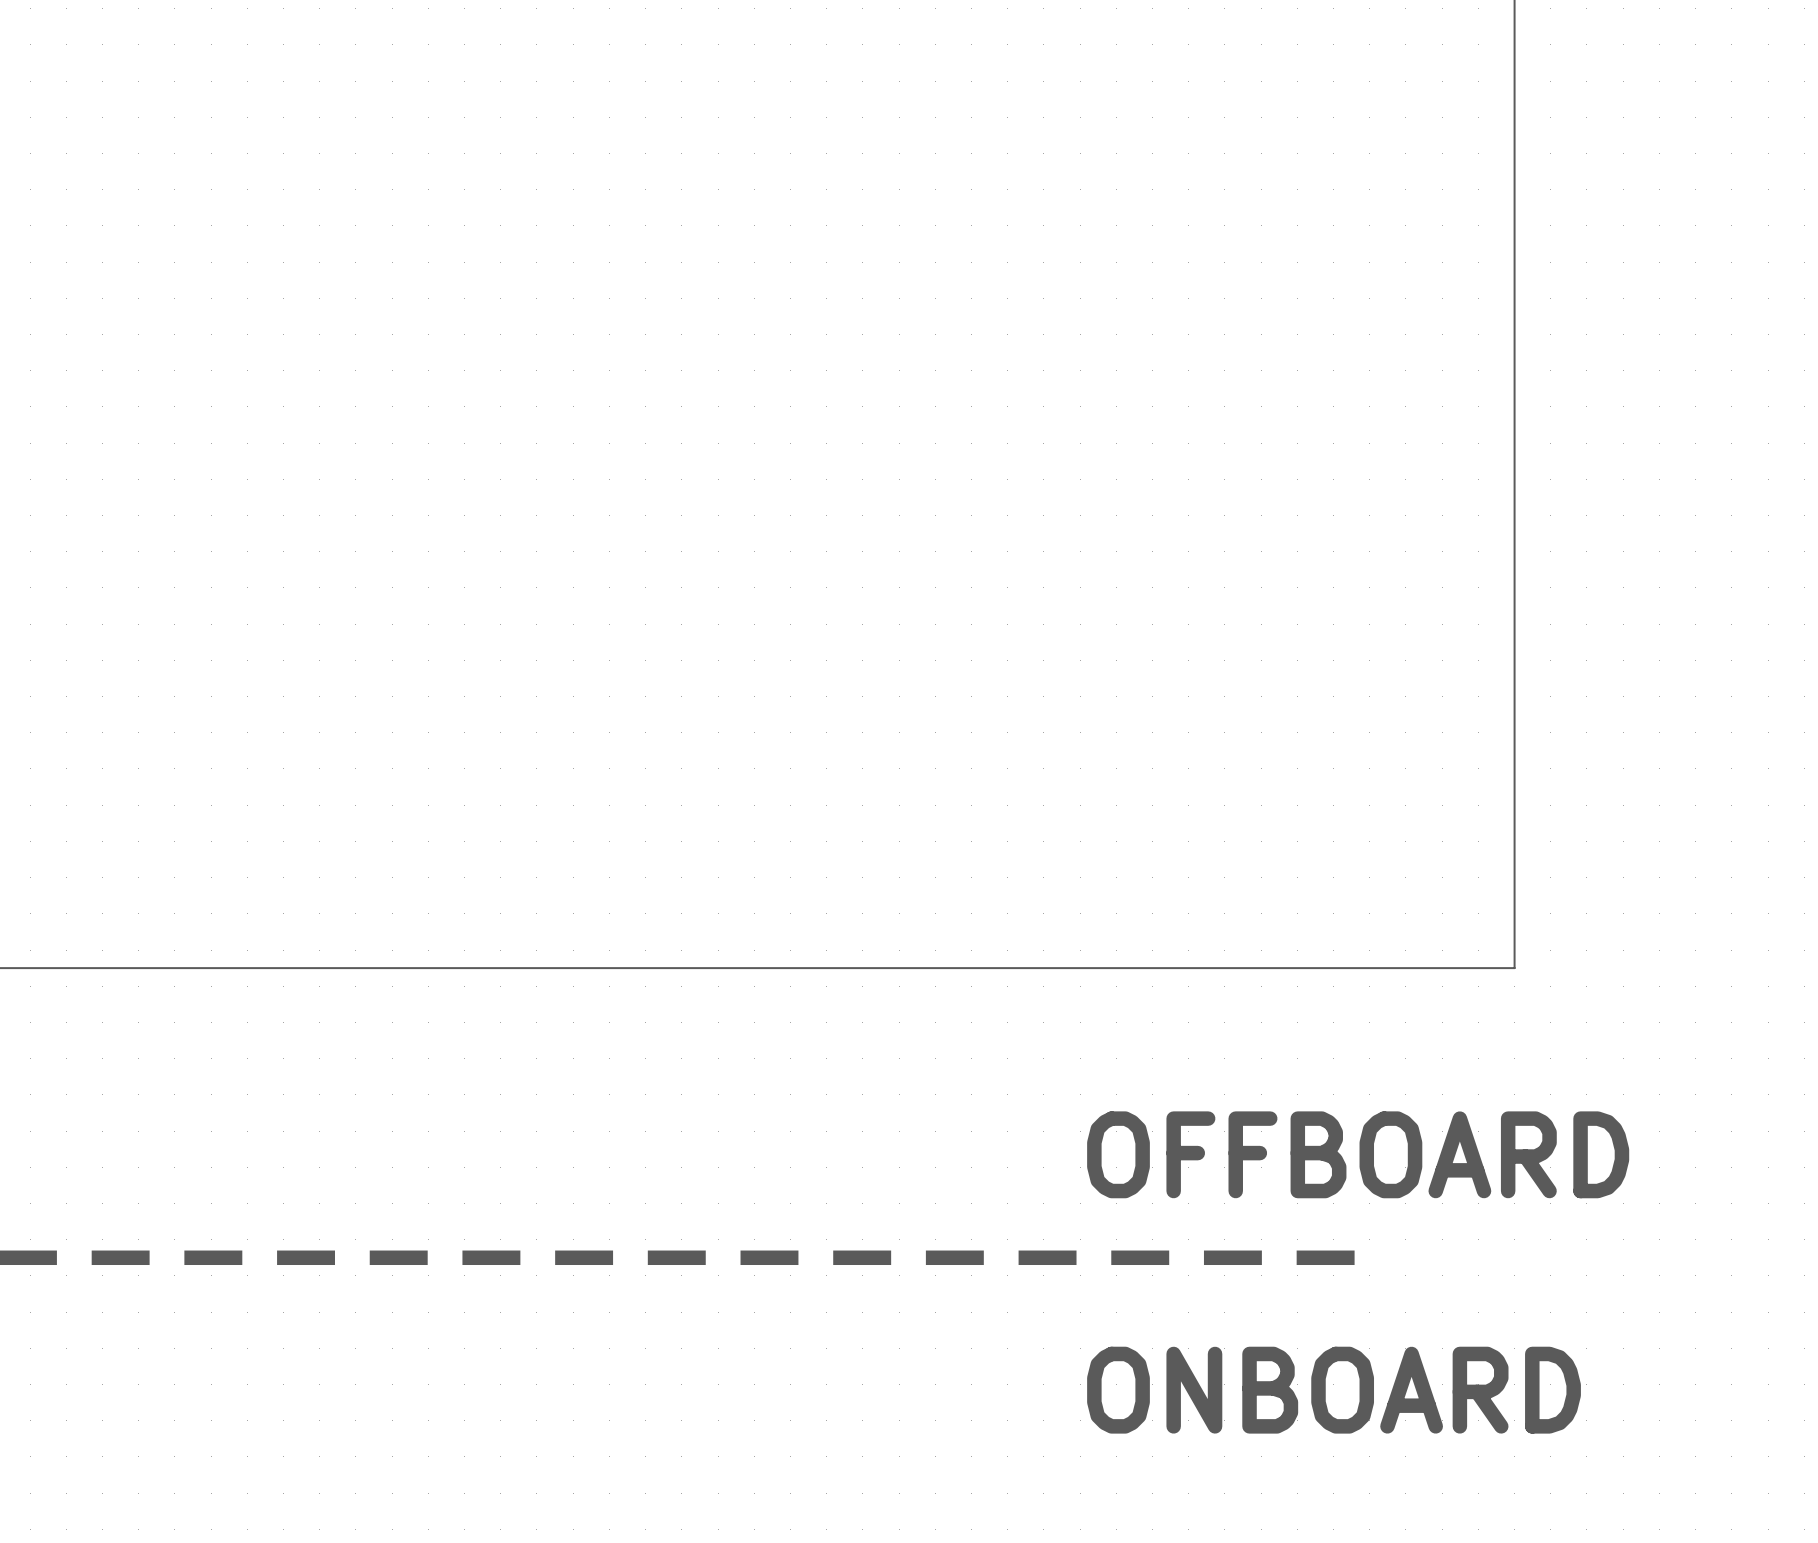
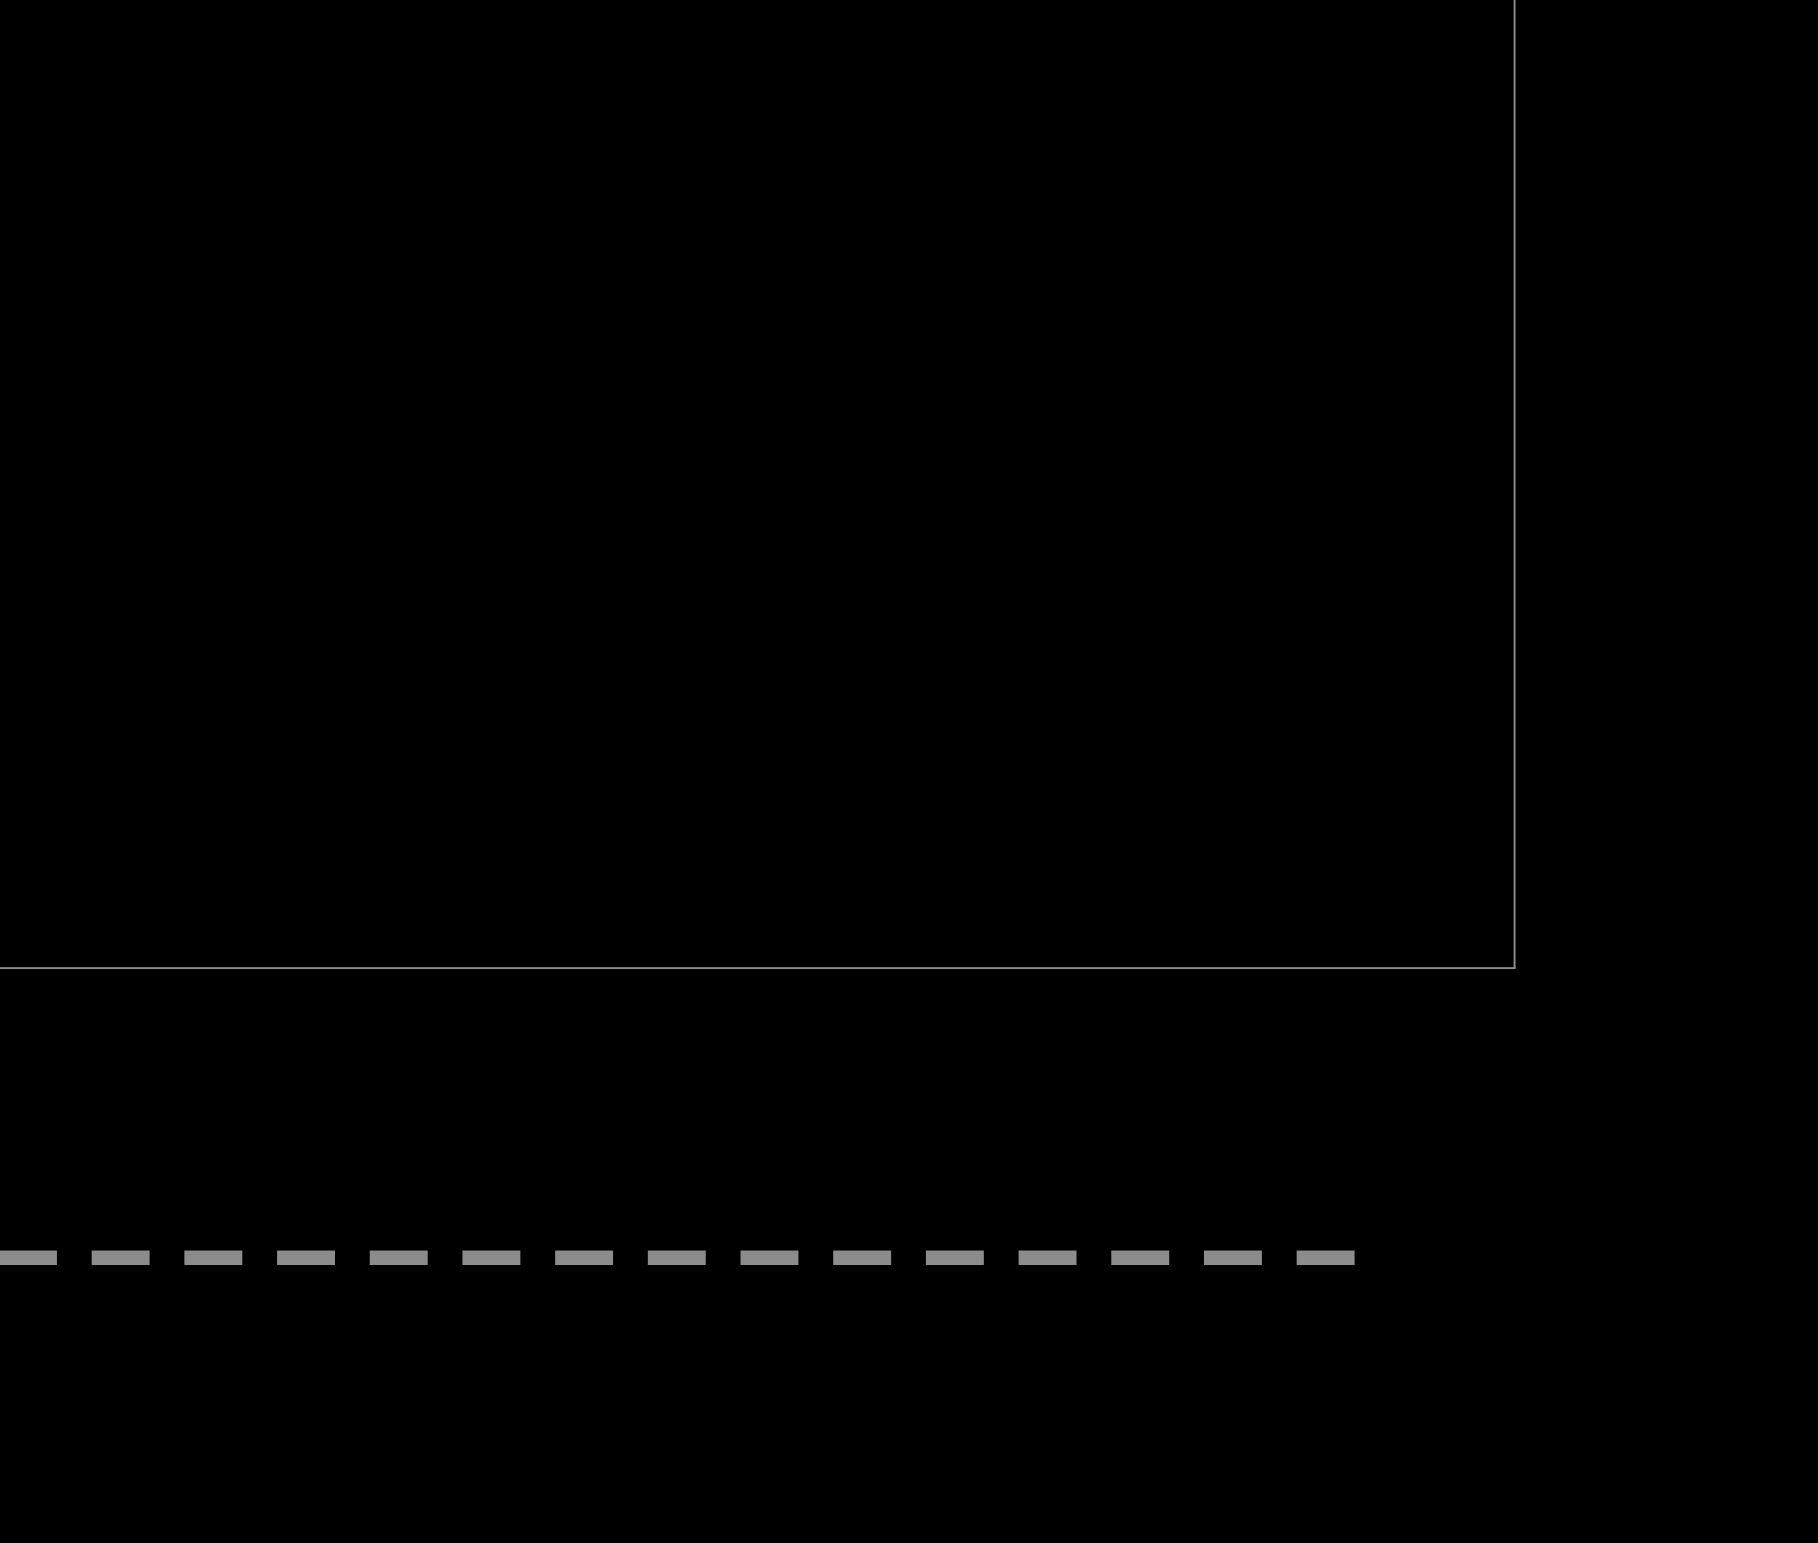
text: OFFBOARD (1358, 1154) -> none
text: ONBOARD (1334, 1390) -> none

